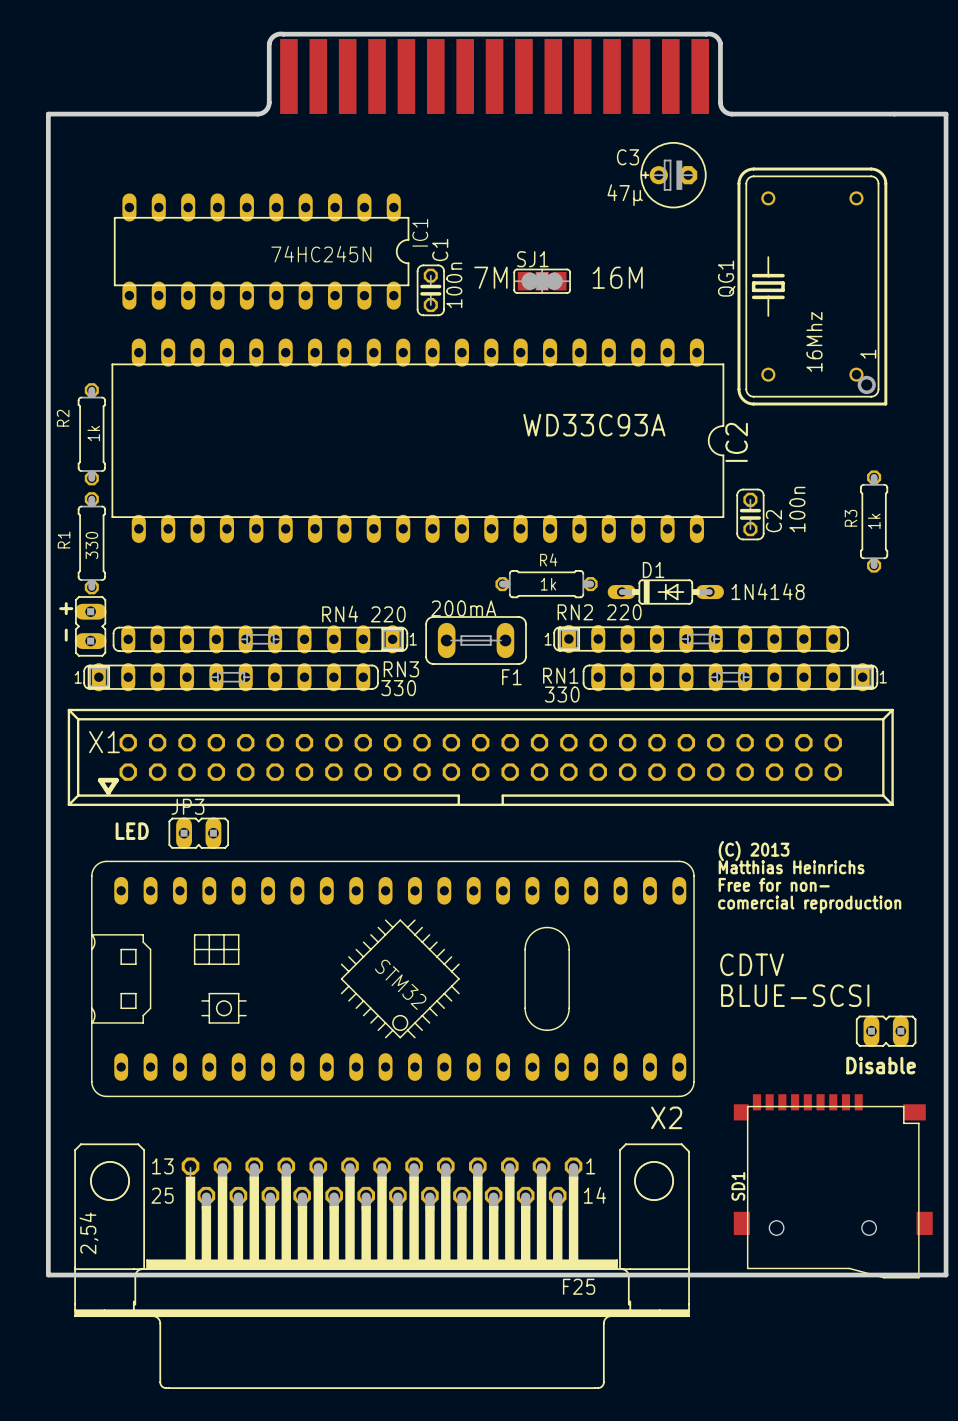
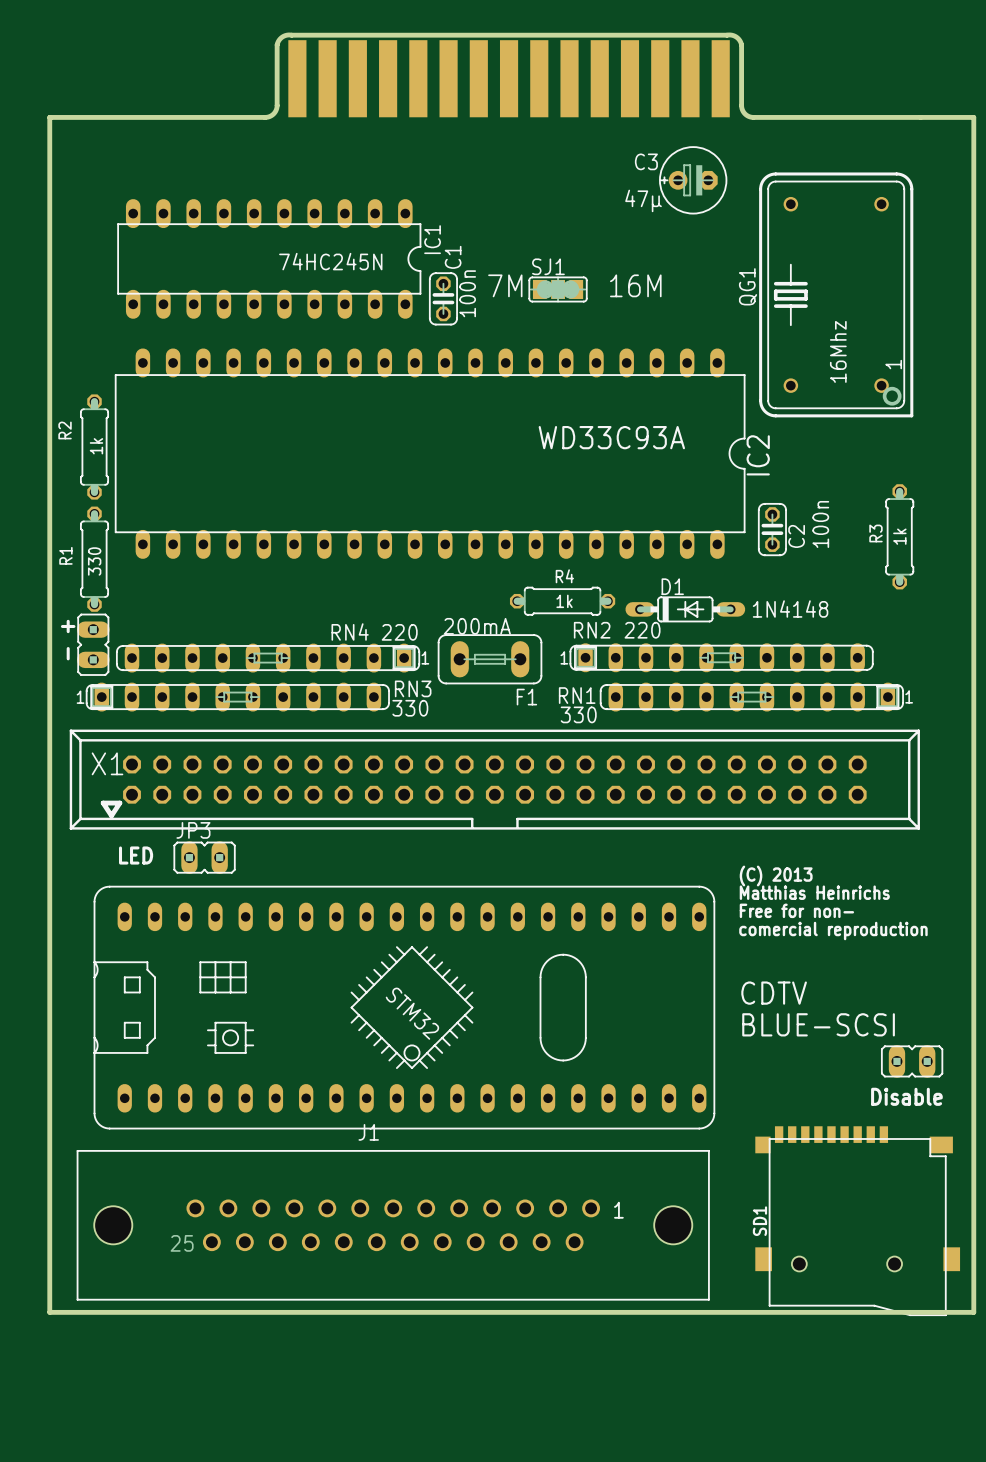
J1: none -> (393, 1225)
X2: (382, 1266) -> none

